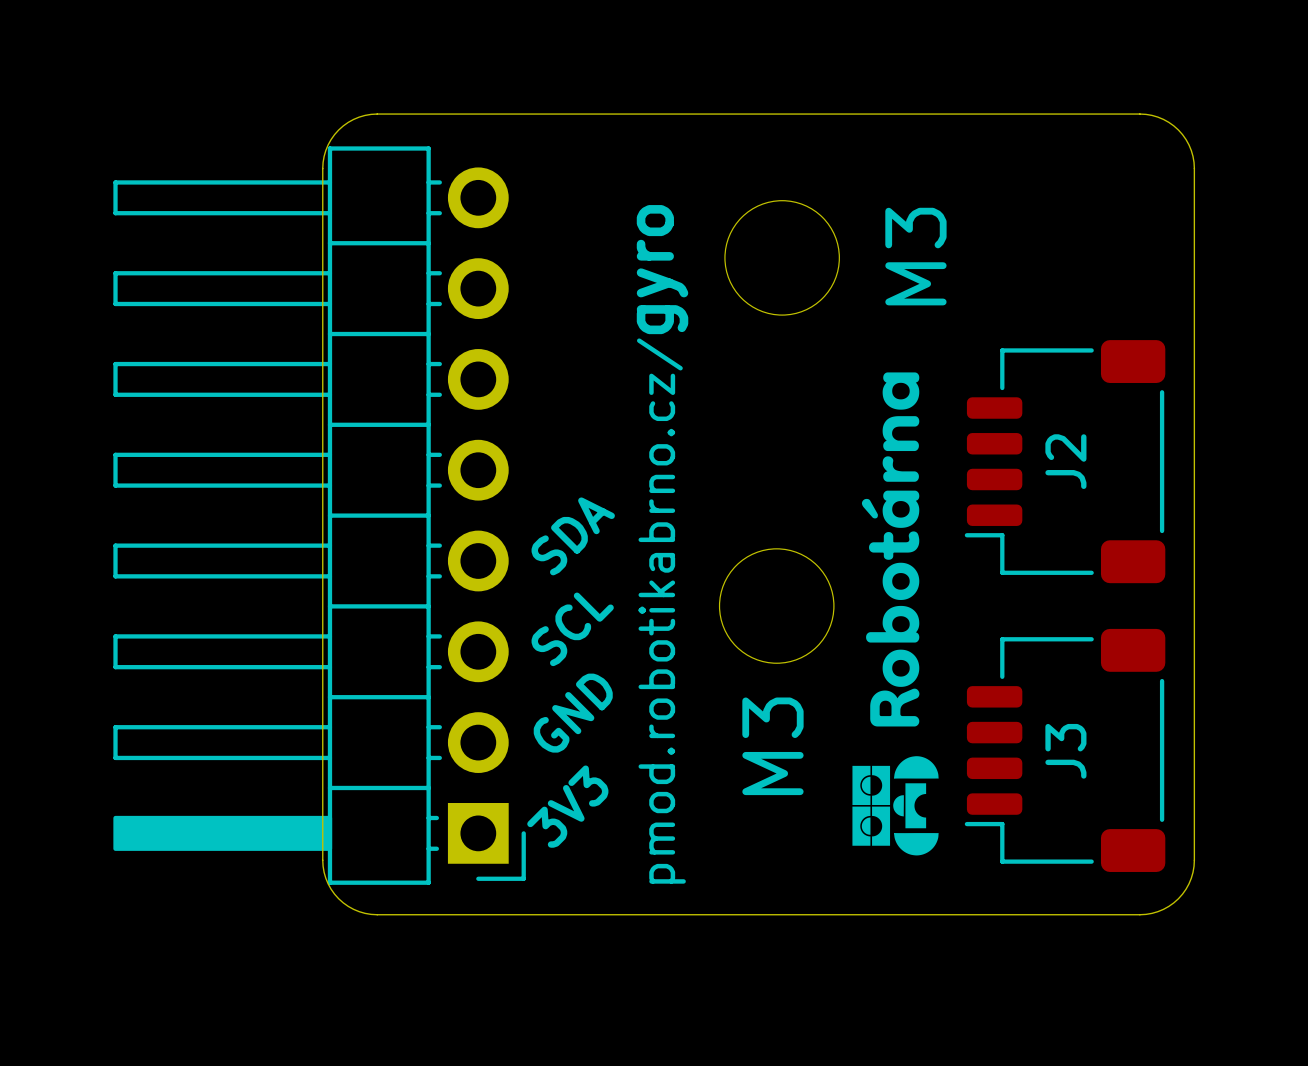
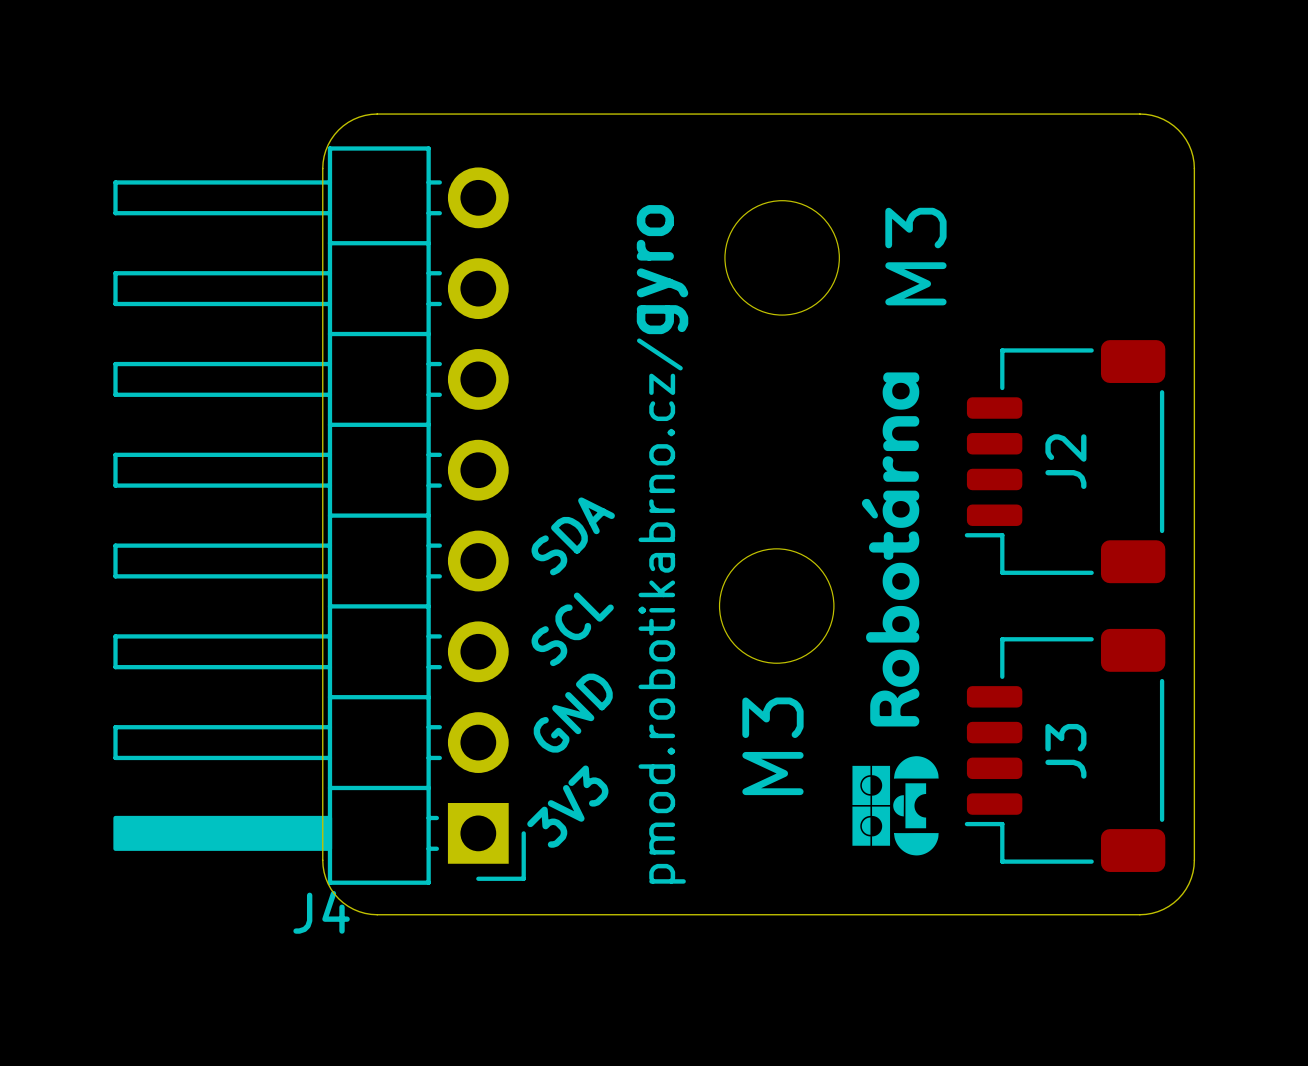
J4 name: none -> J4 (321, 912)

